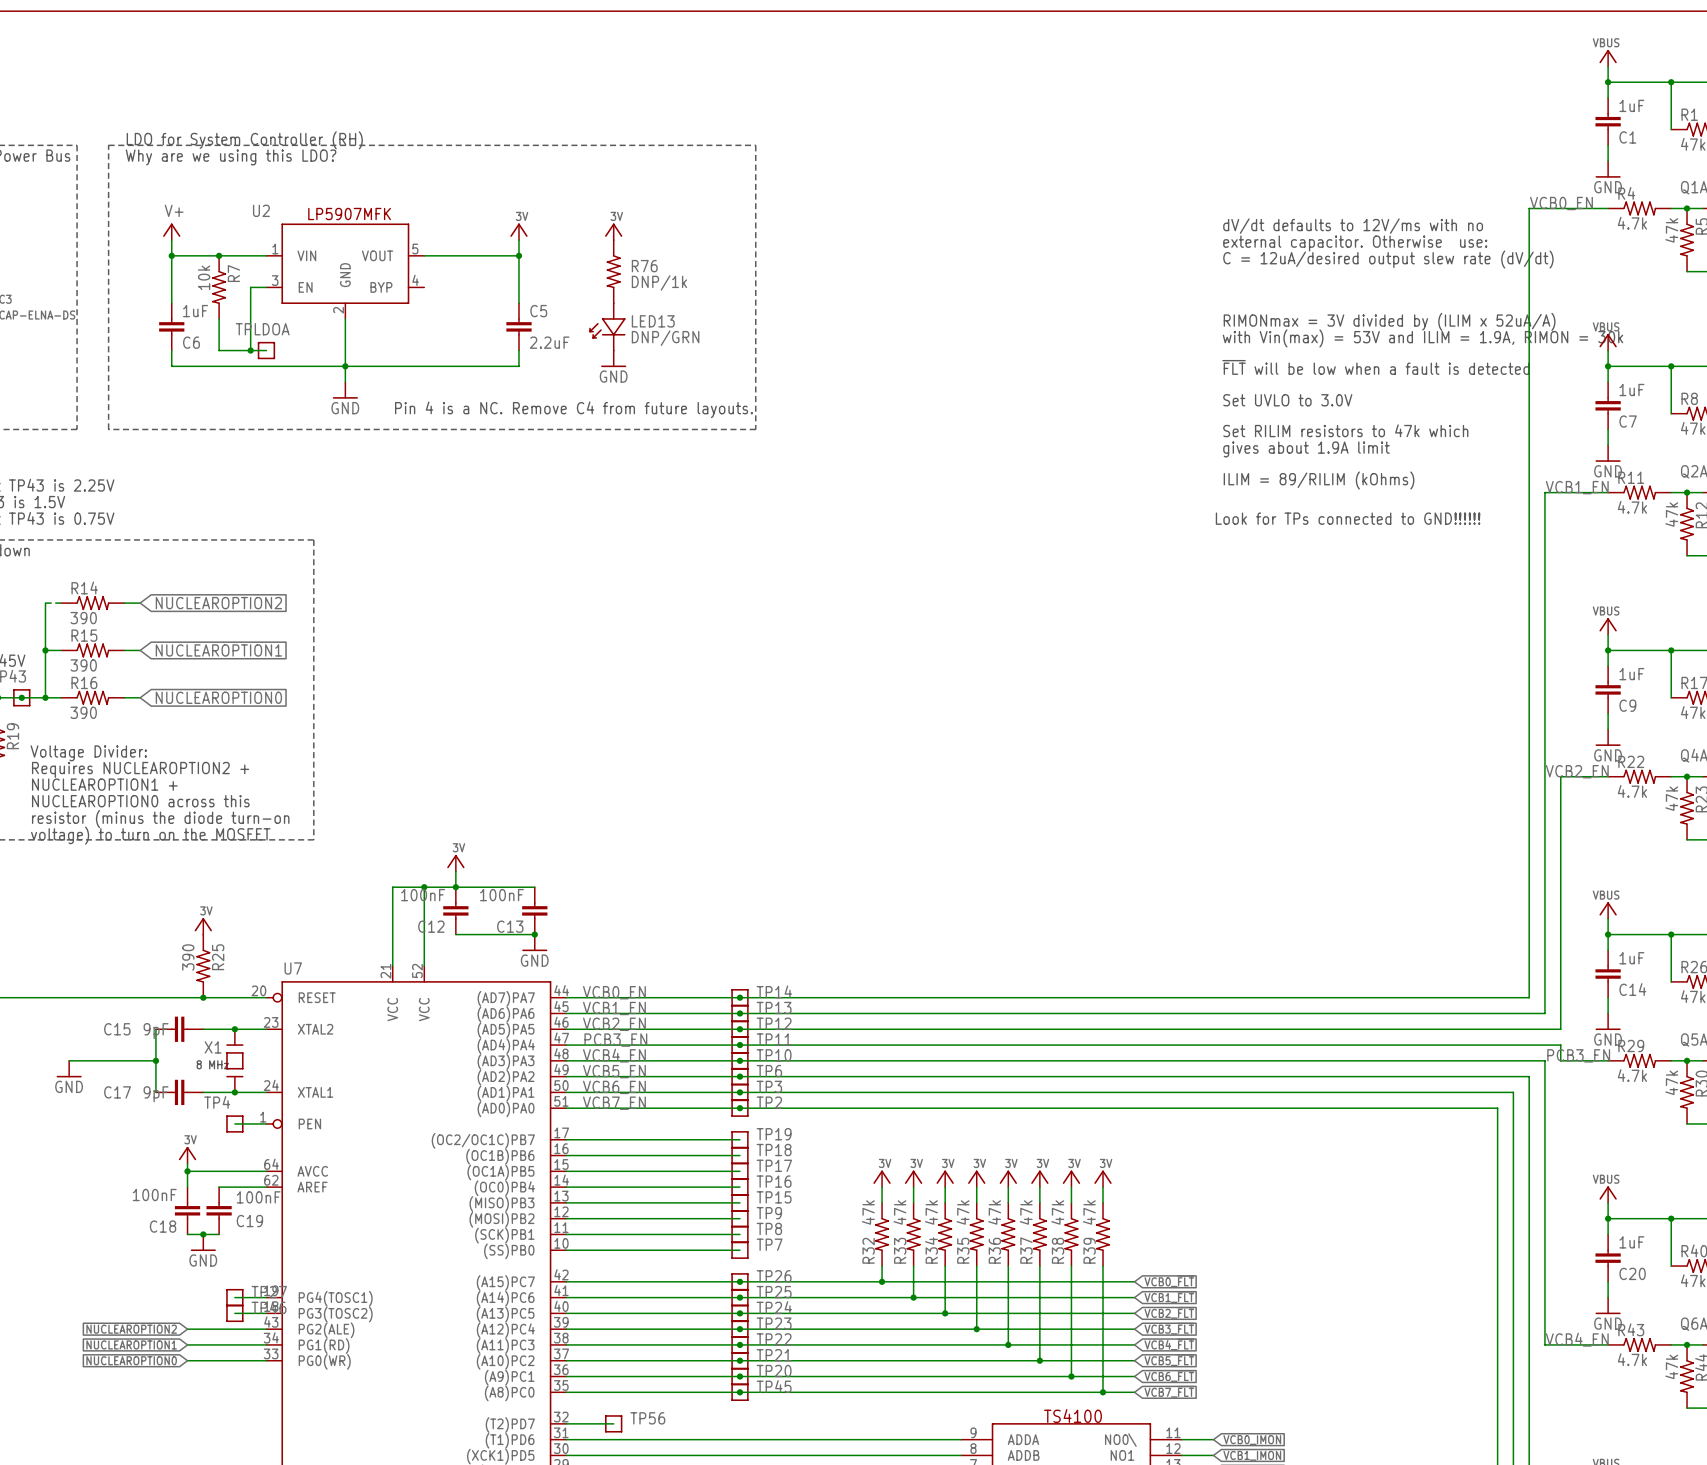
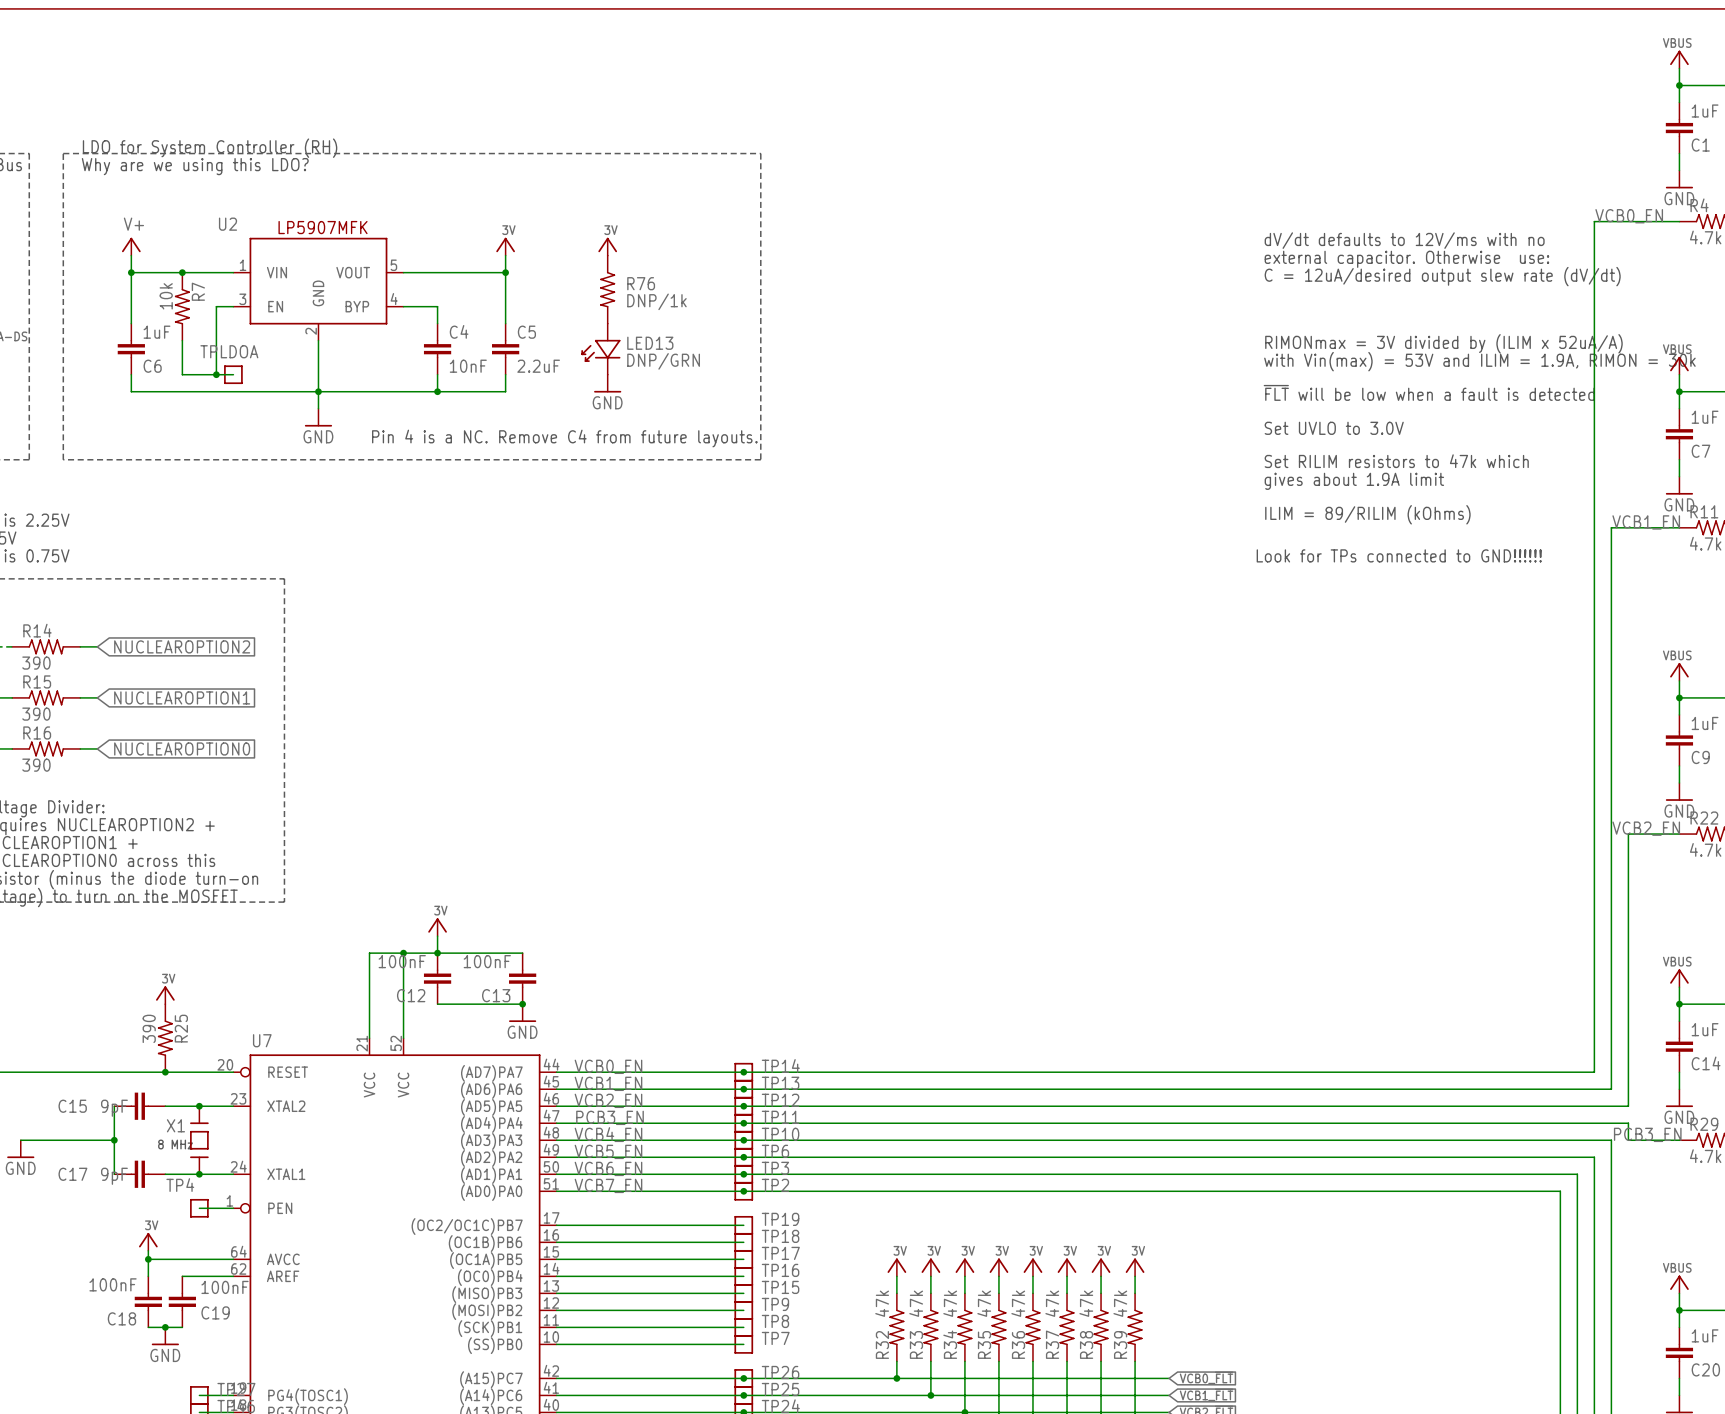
wire: none -> (403, 306) (437, 306) (437, 323)
C4: none -> 10nF (437, 349)
wire: none -> (437, 374) (437, 391)
junction: none -> (437, 391)

